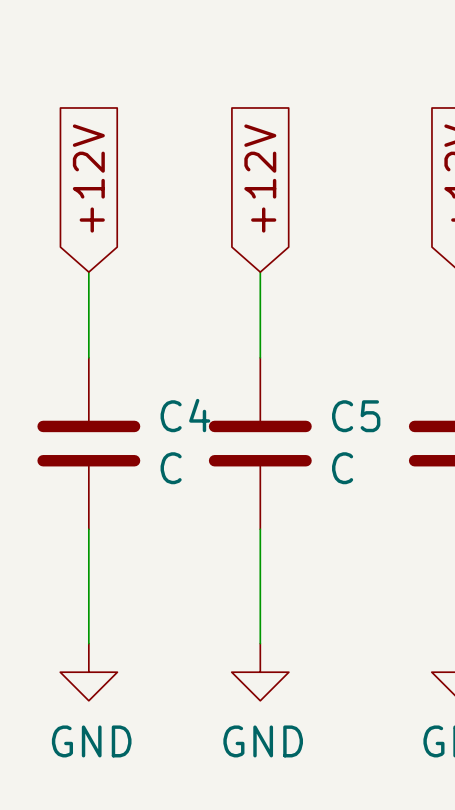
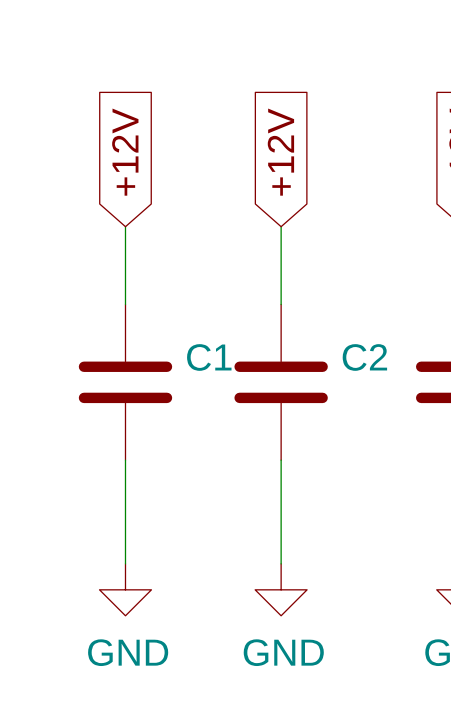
C4 name: C4 (185, 415) -> C1 (209, 357)
C5 name: C5 (356, 416) -> C2 (364, 357)
C4 value: C (171, 468) -> none
C5 value: C (342, 468) -> none

